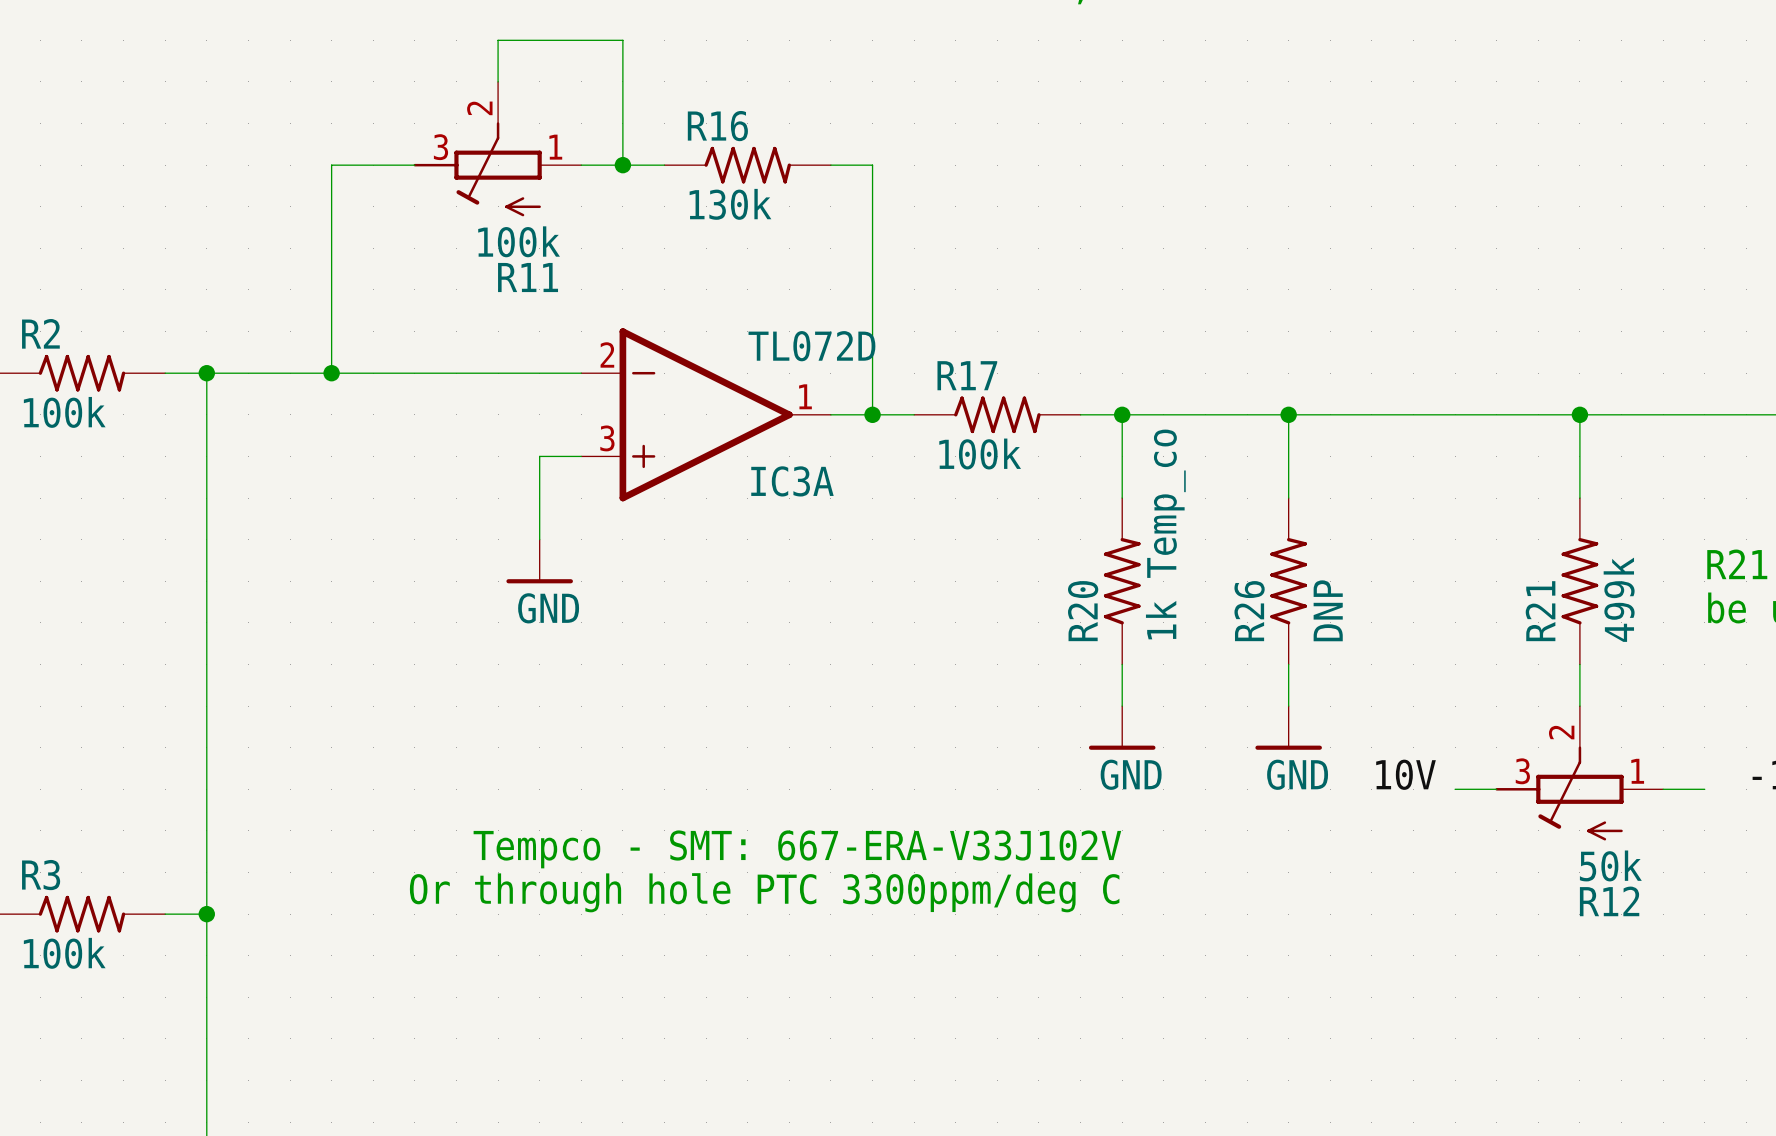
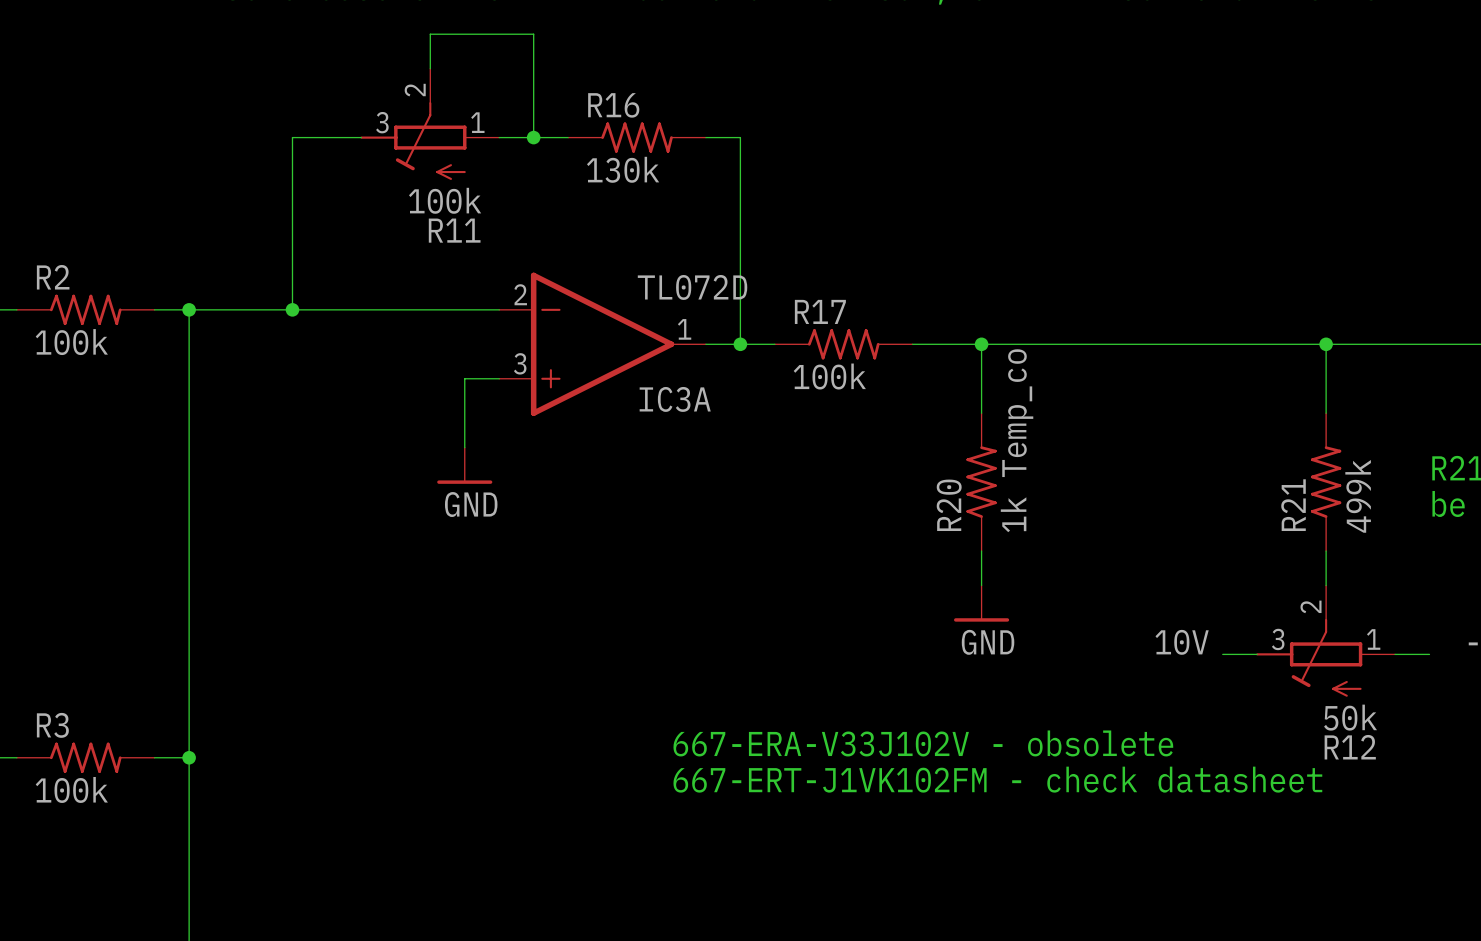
wire: (1122, 414) (1122, 498) -> (981, 344) (981, 413)
junction position: (1122, 414) -> (981, 344)
wire: (1288, 414) (1288, 498) -> none
junction: (1288, 414) -> none
R20 position: (1122, 581) -> (981, 482)
R26: DNP (1288, 581) -> none
wire: (1122, 664) (1122, 706) -> (981, 551) (981, 585)
wire: (1288, 664) (1288, 706) -> none
power symbol position: GND (1122, 727) -> GND (981, 603)
power symbol: GND (1288, 727) -> none
text: Tempco - SMT: 667-ERA-V33J102V (797, 849) -> none
text: Or through hole PTC 3300ppm/deg C (764, 892) -> none
text: none -> 667-ERA-V33J102V - obsolete (923, 743)
text: none -> 667-ERT-J1VK102FM - check datasheet (997, 779)

